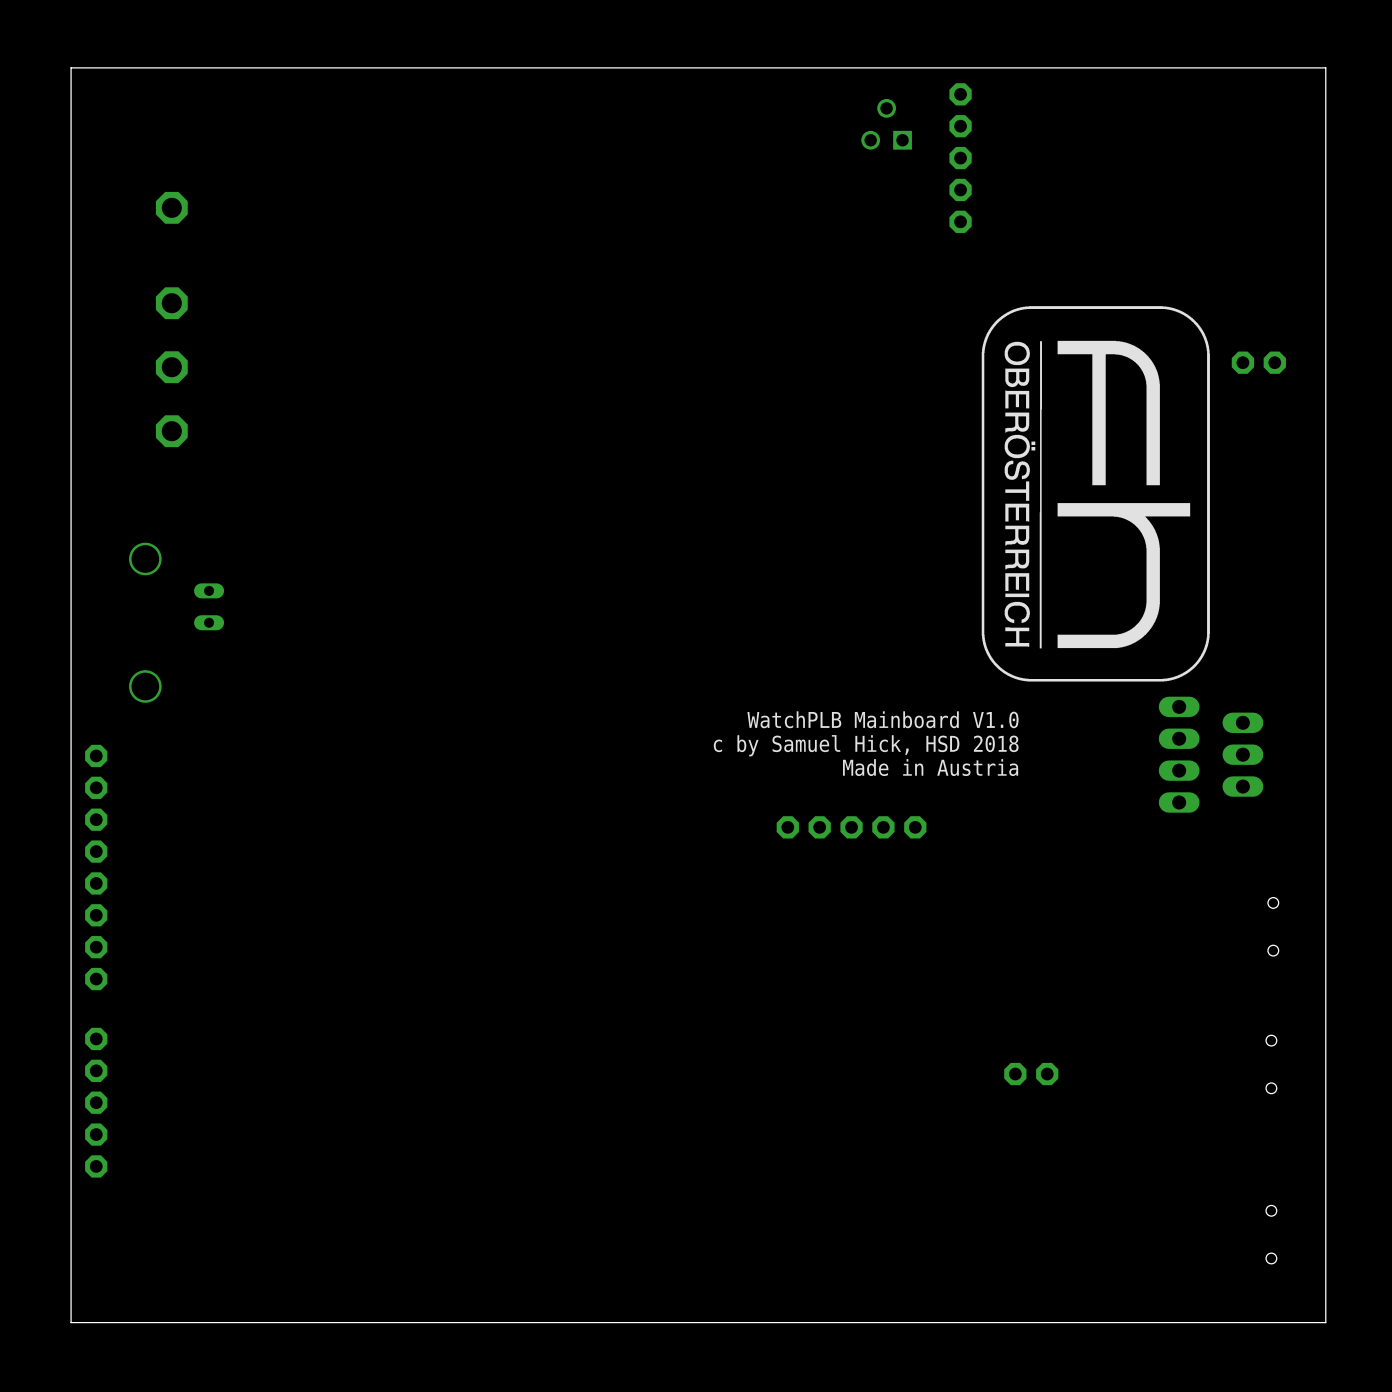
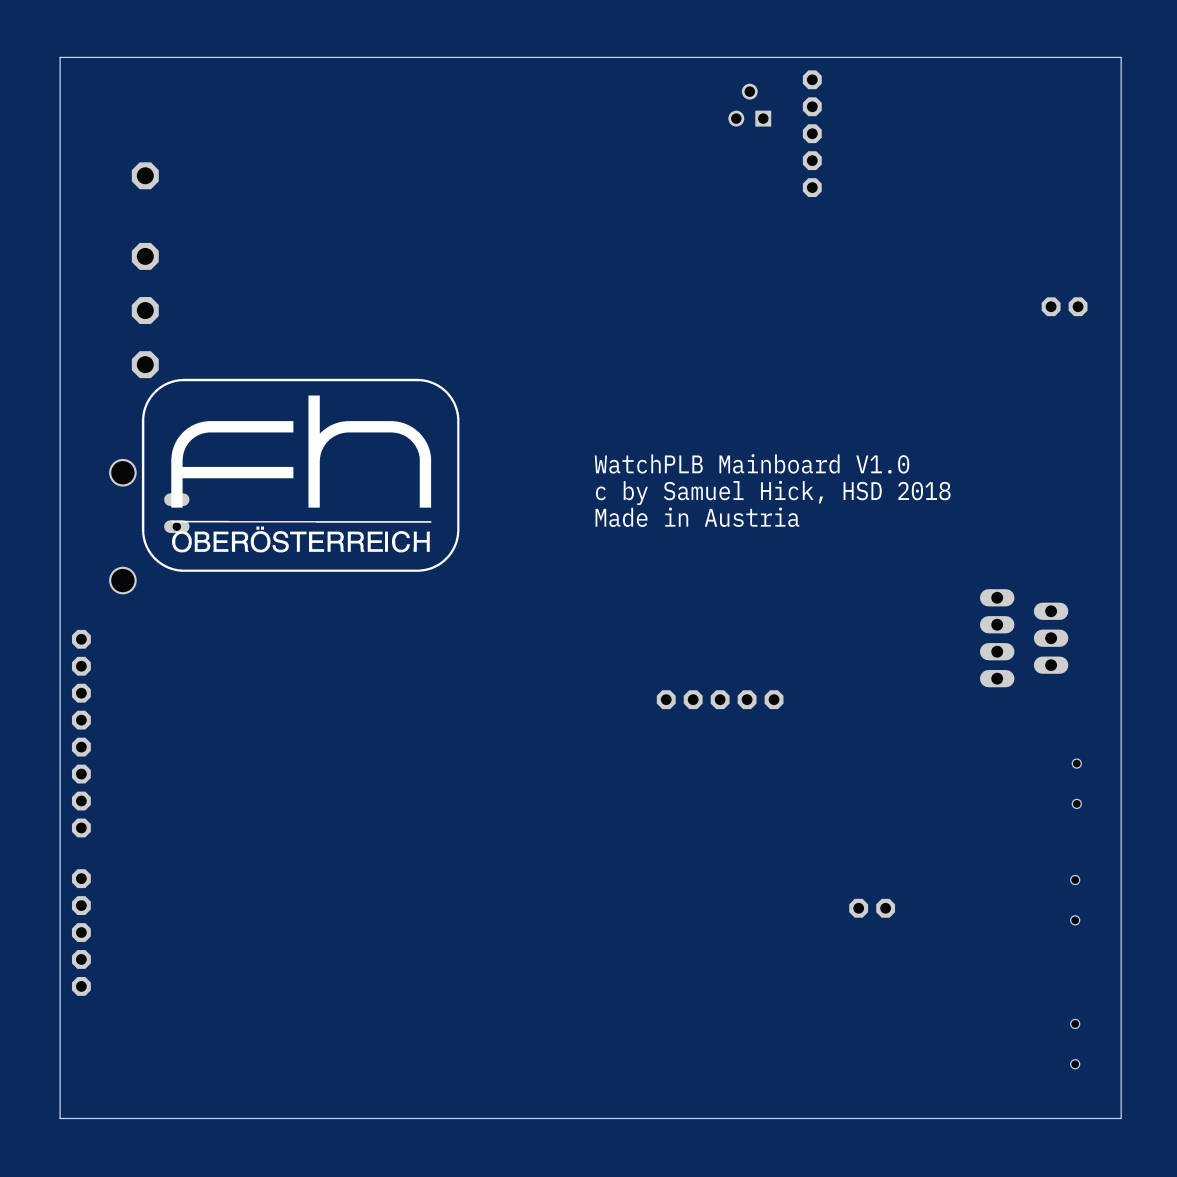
drawing: [981, 306, 1210, 682] -> none
drawing: none -> [141, 378, 460, 572]
text: none -> WatchPLB Mainboard V1.0 (752, 463)
text: none -> c by Samuel Hick, HSD 2018 (773, 492)
text: none -> Made in Austria (697, 517)
text: WatchPLB Mainboard V1.0 (882, 719) -> none
text: c by Samuel Hick, HSD 2018 (866, 745) -> none
text: Made in Austria (930, 767) -> none

